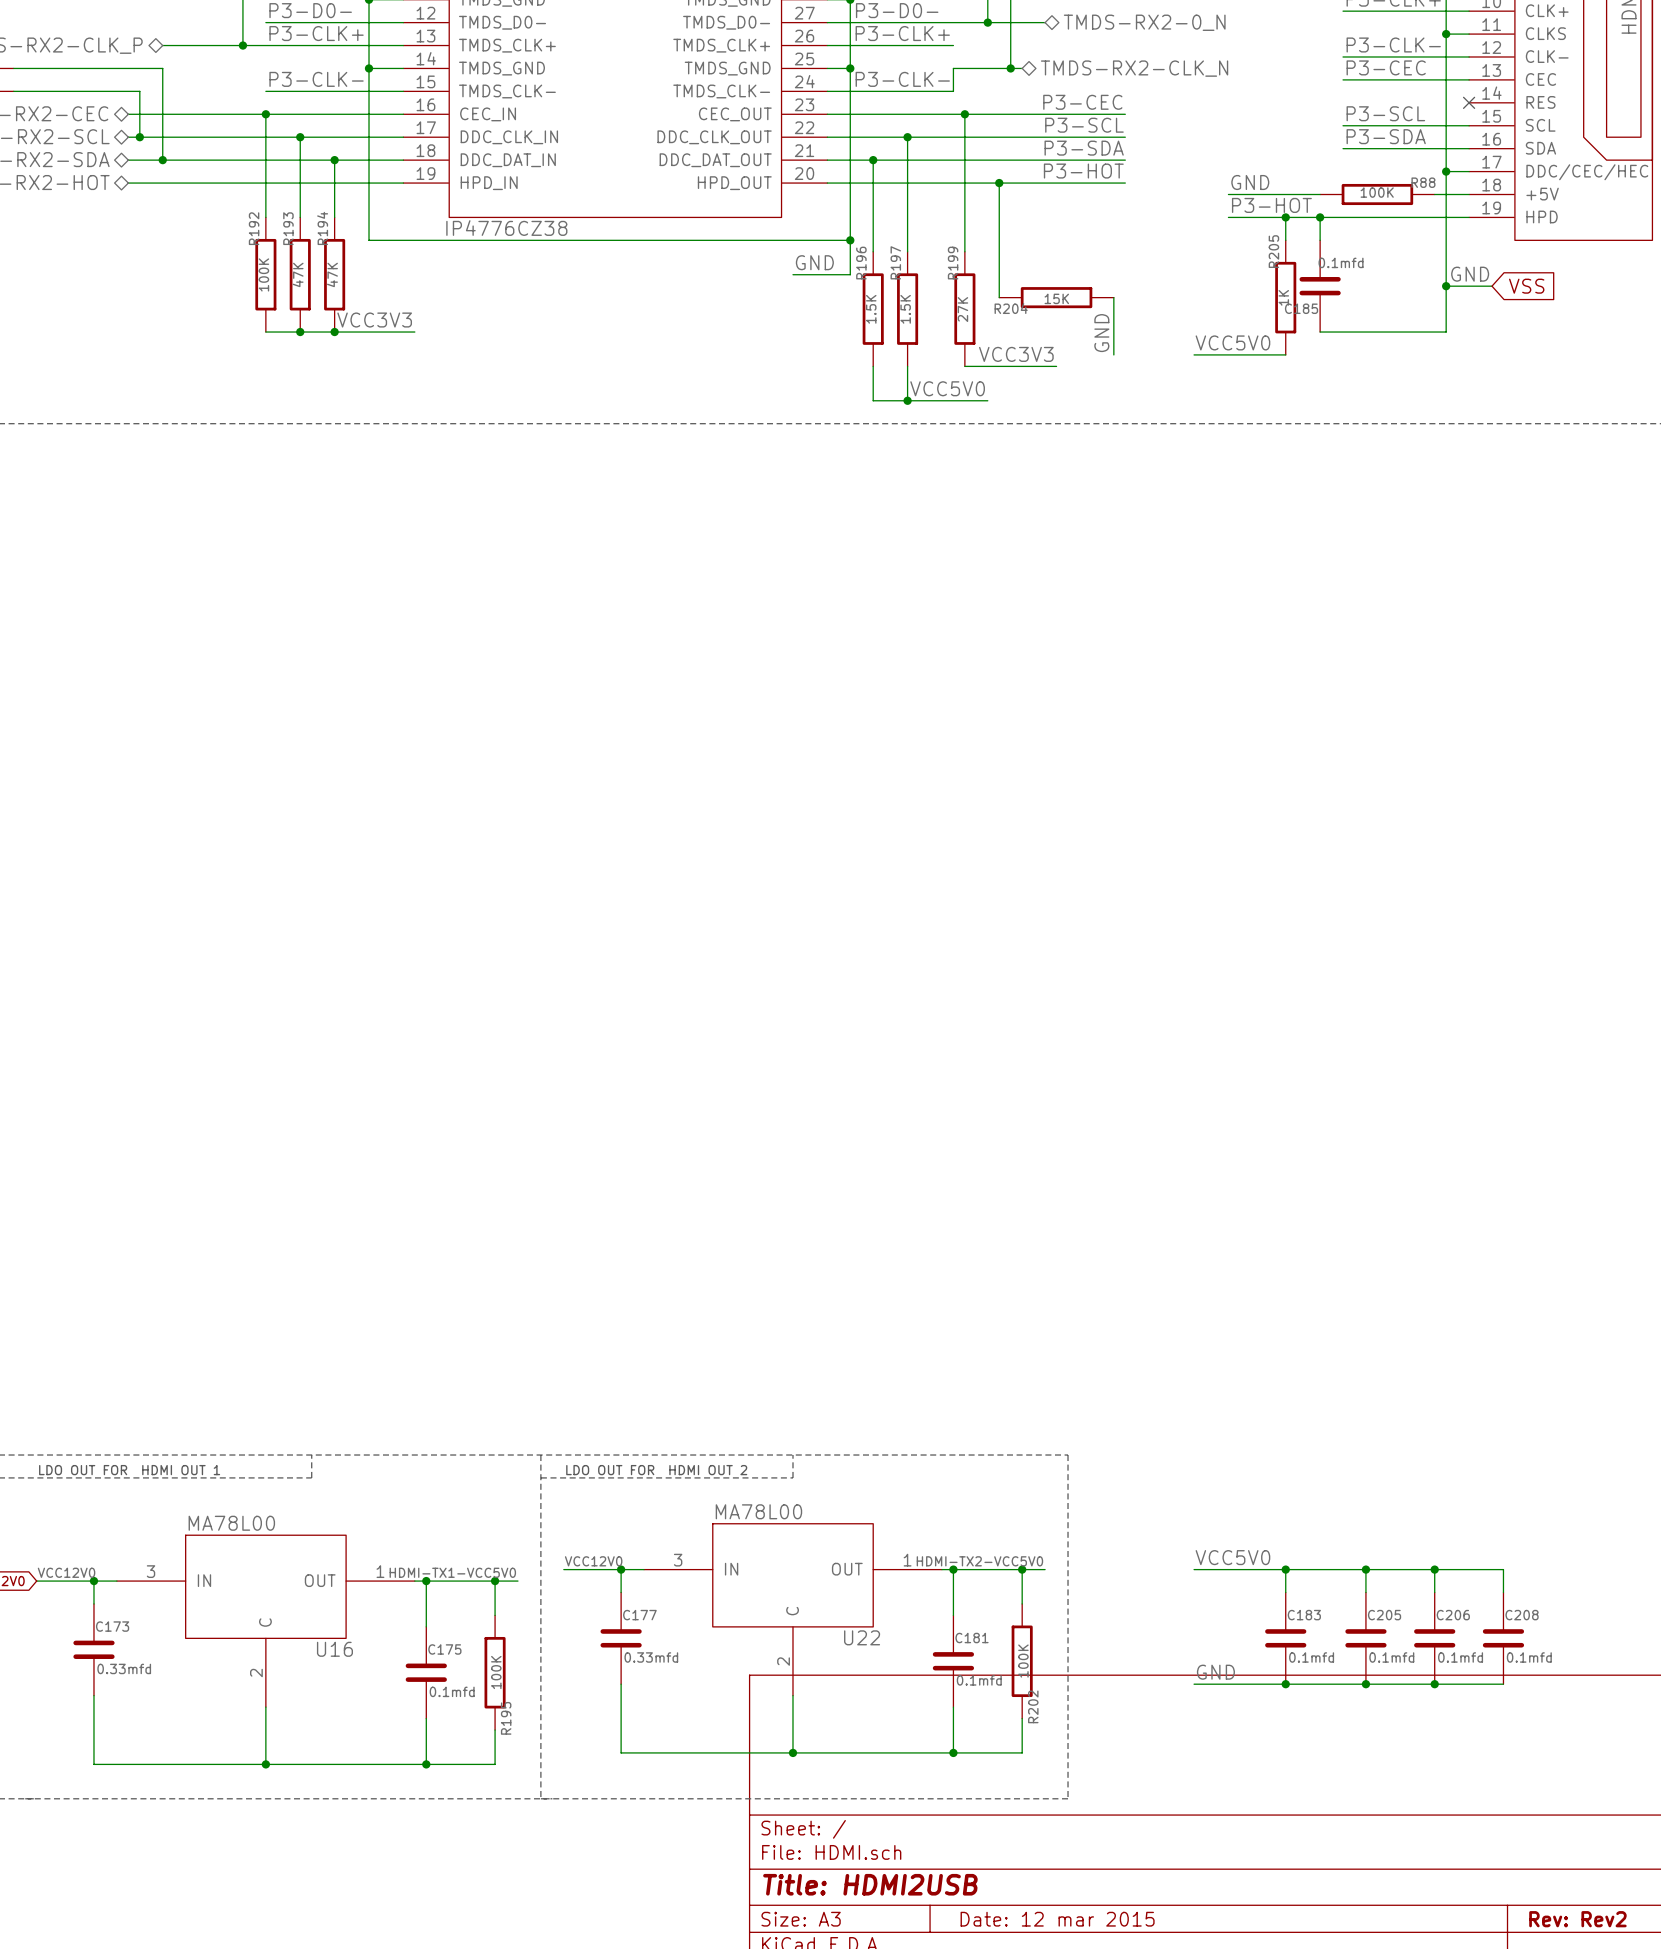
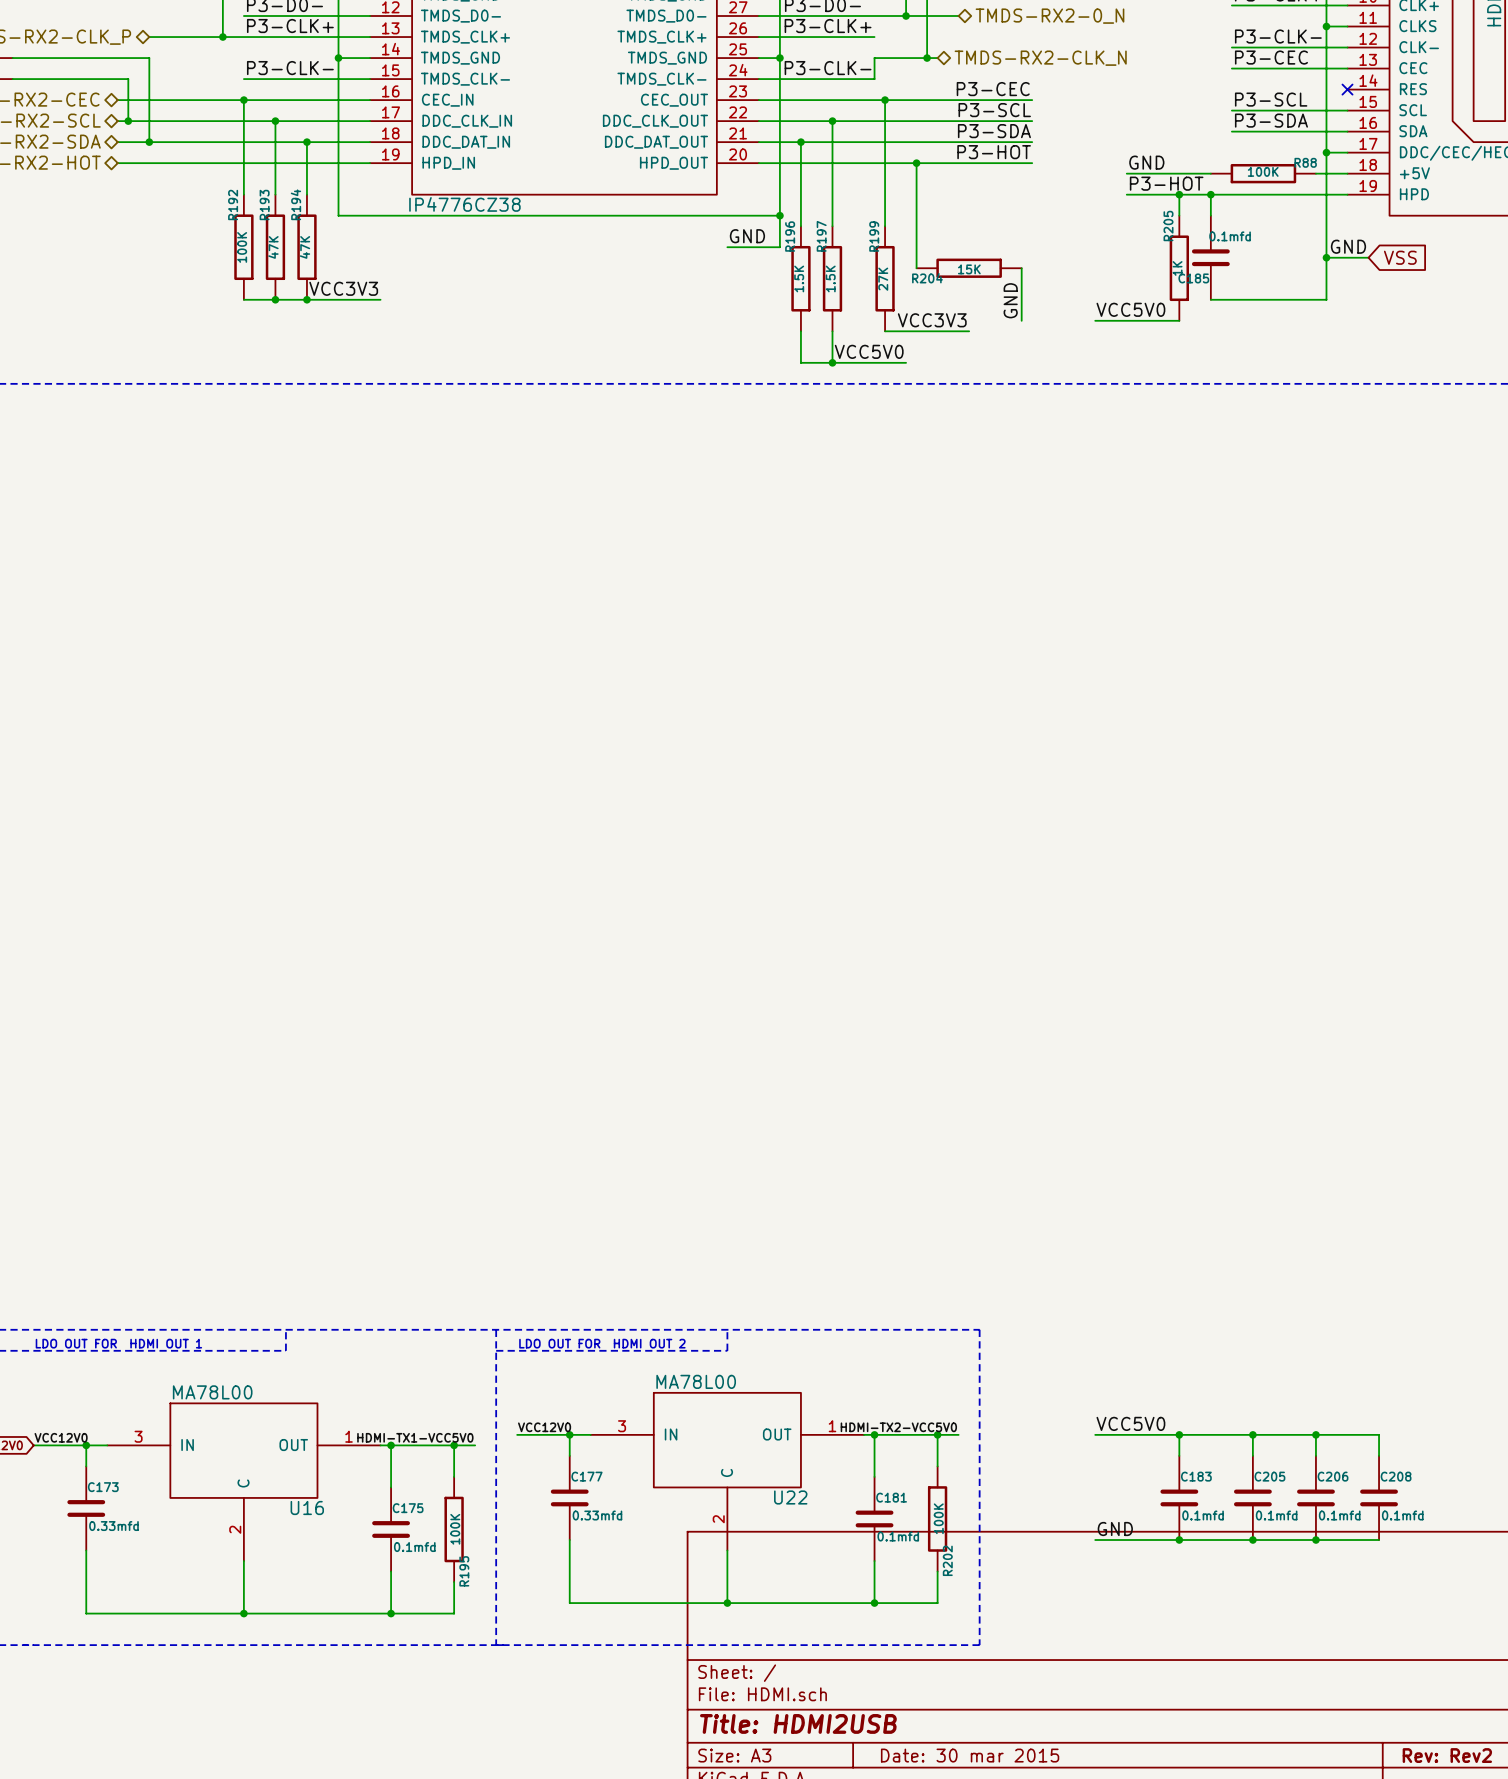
title block: Date: 12 mar 2015 (1057, 1919) -> Date: 30 mar 2015 (970, 1755)

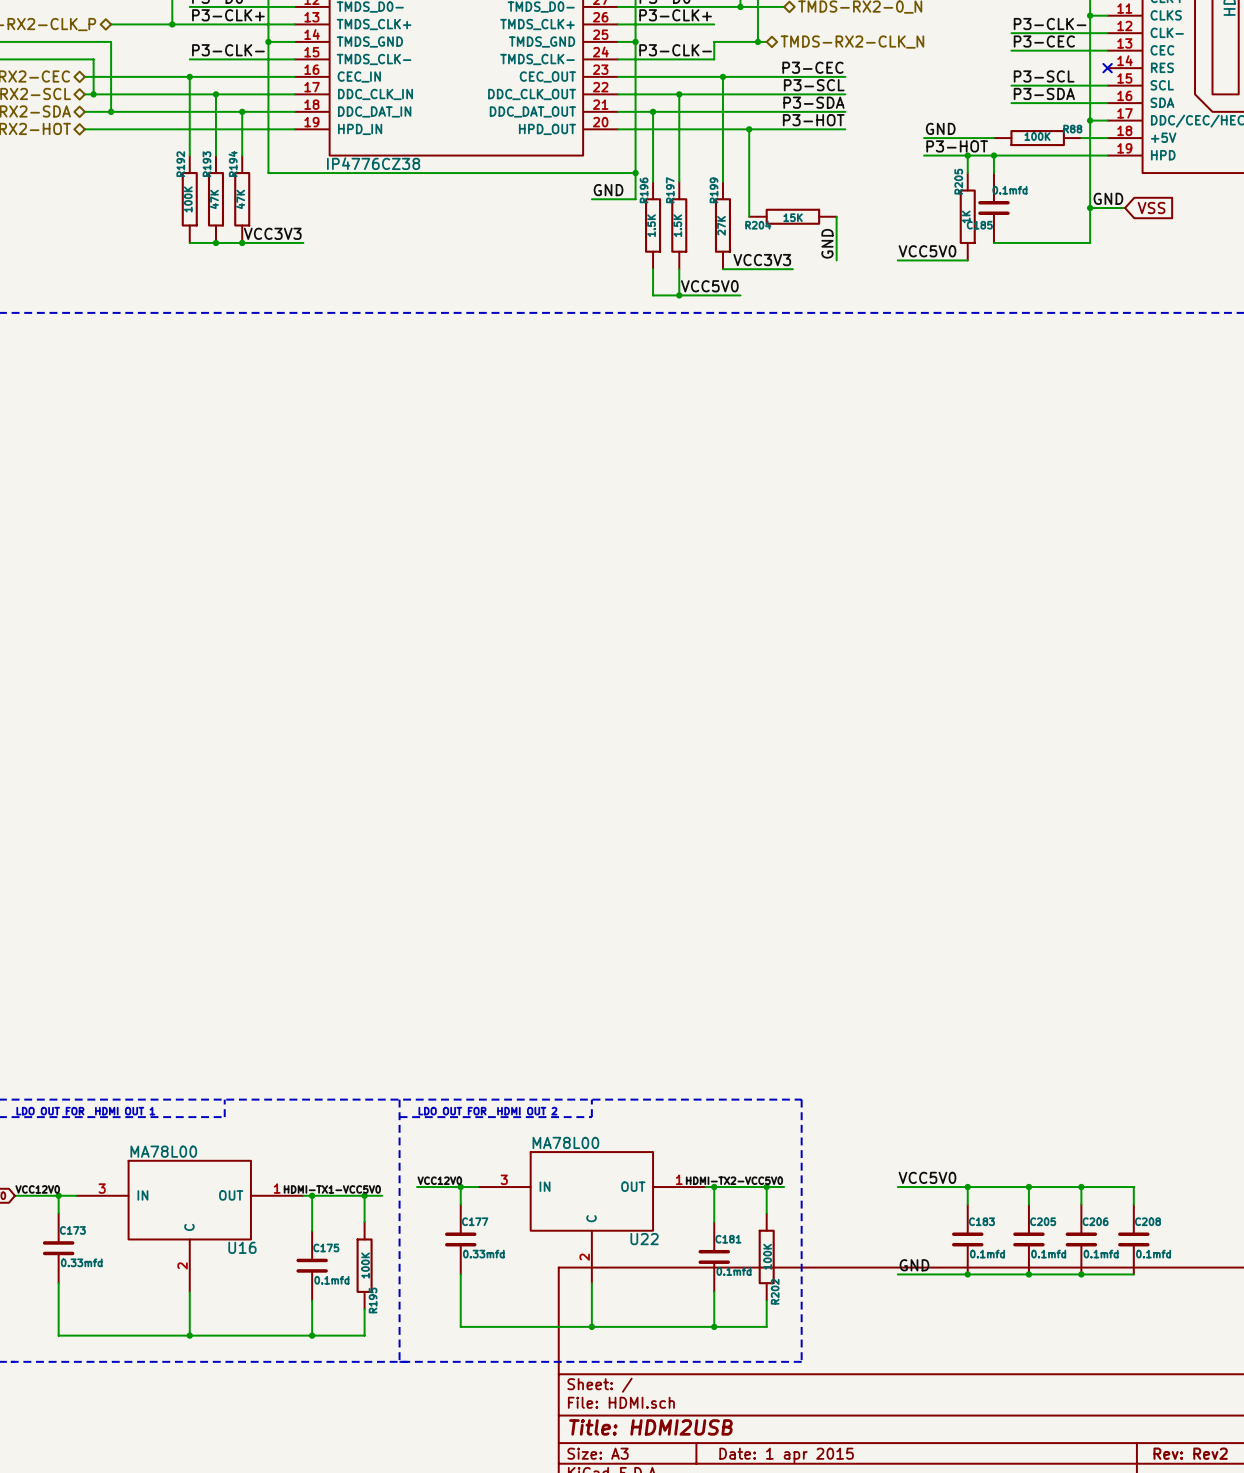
title block: Date: 30 mar 2015 (970, 1755) -> Date: 1 apr 2015 (786, 1455)

